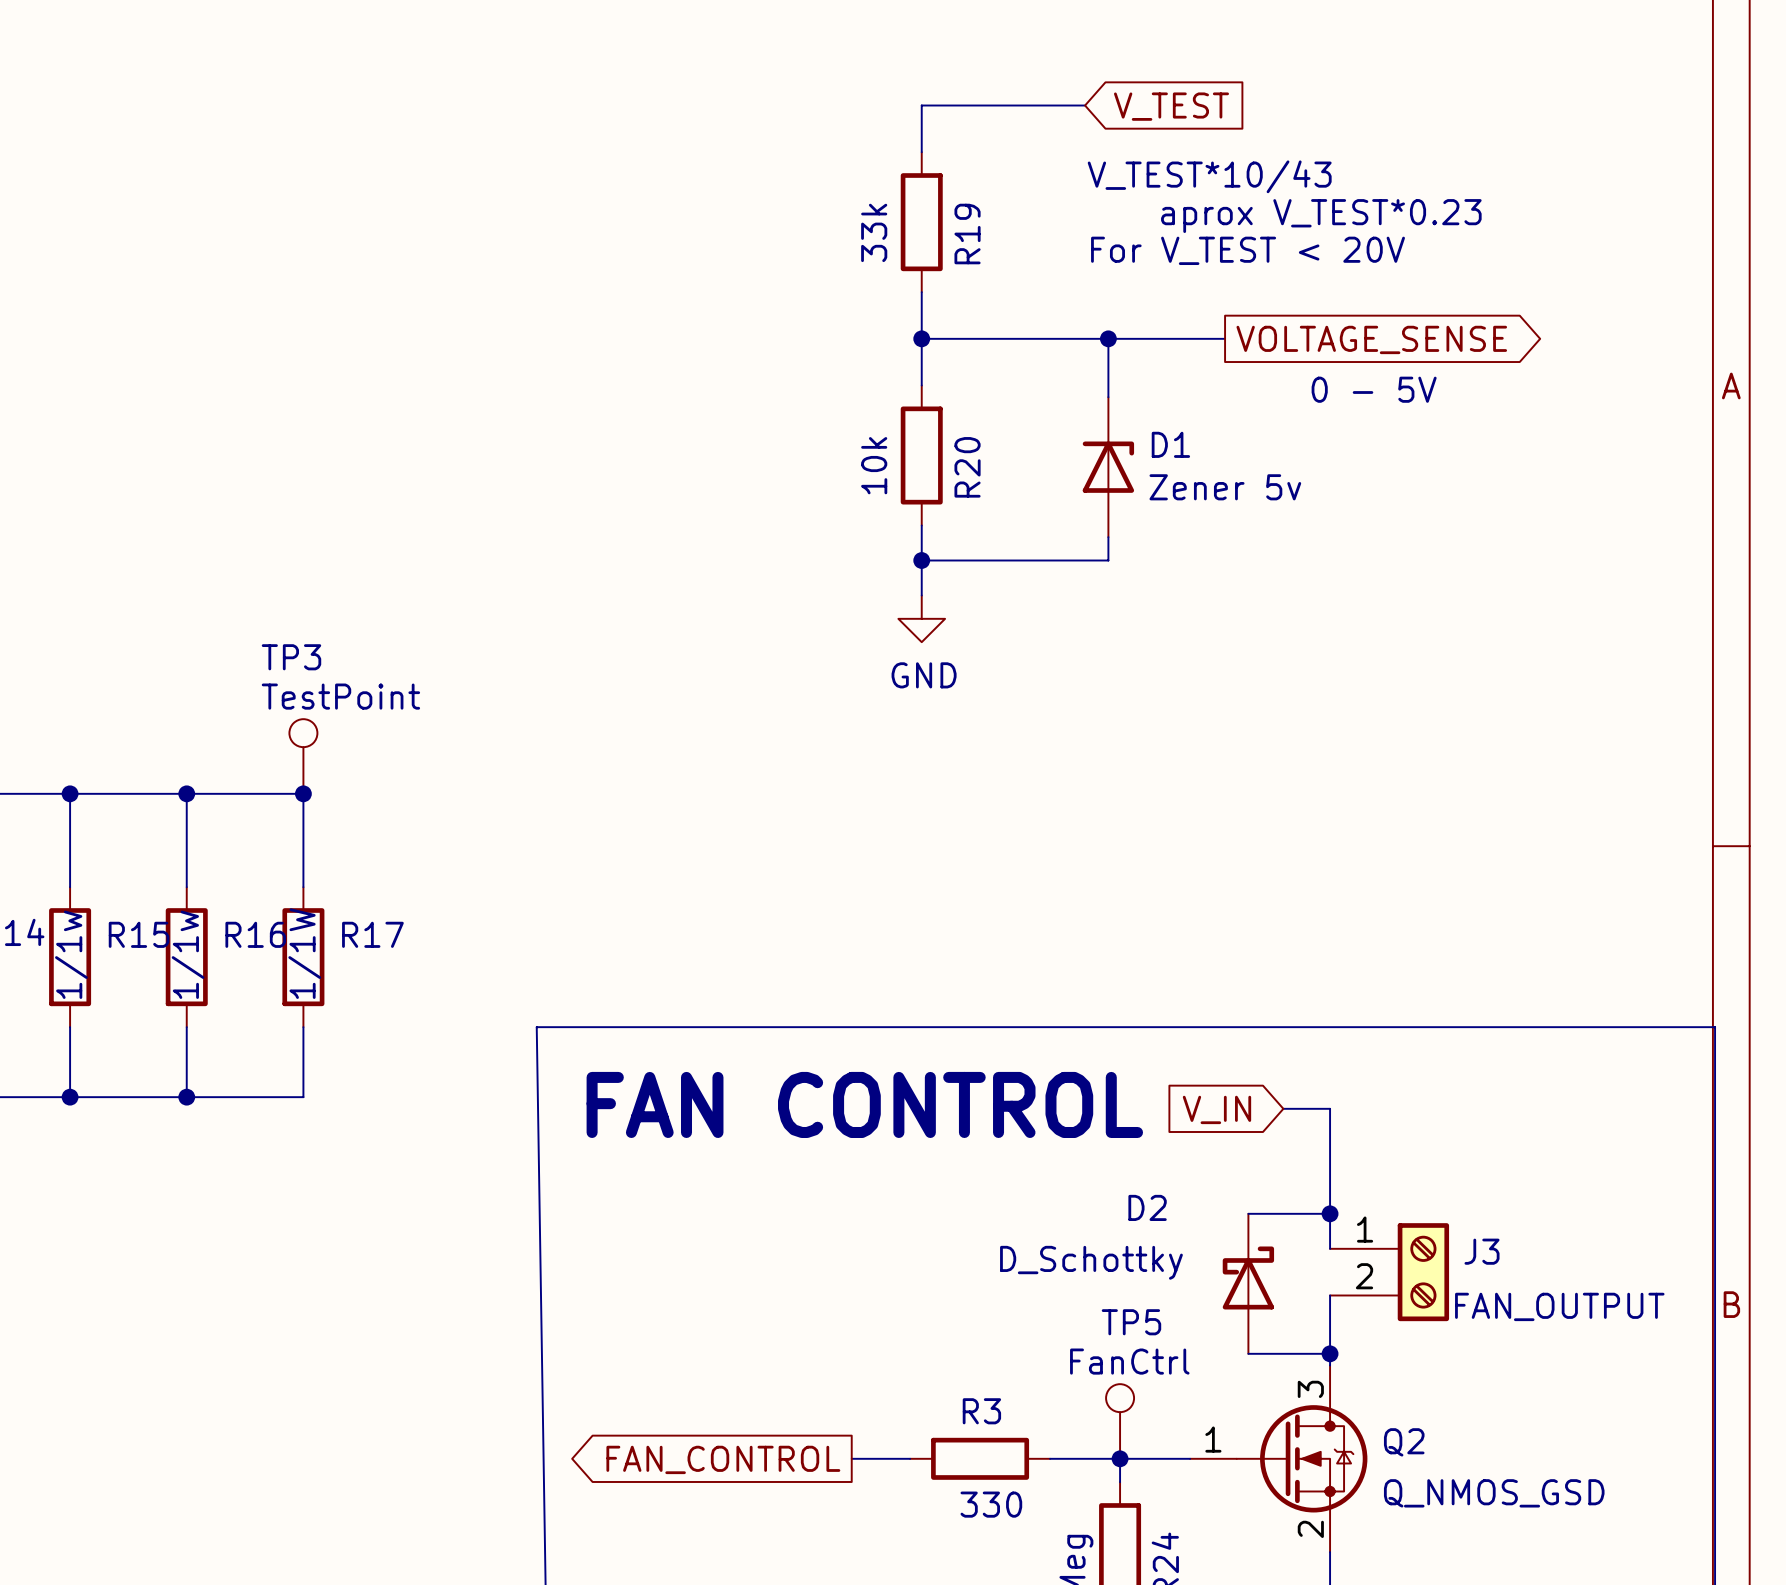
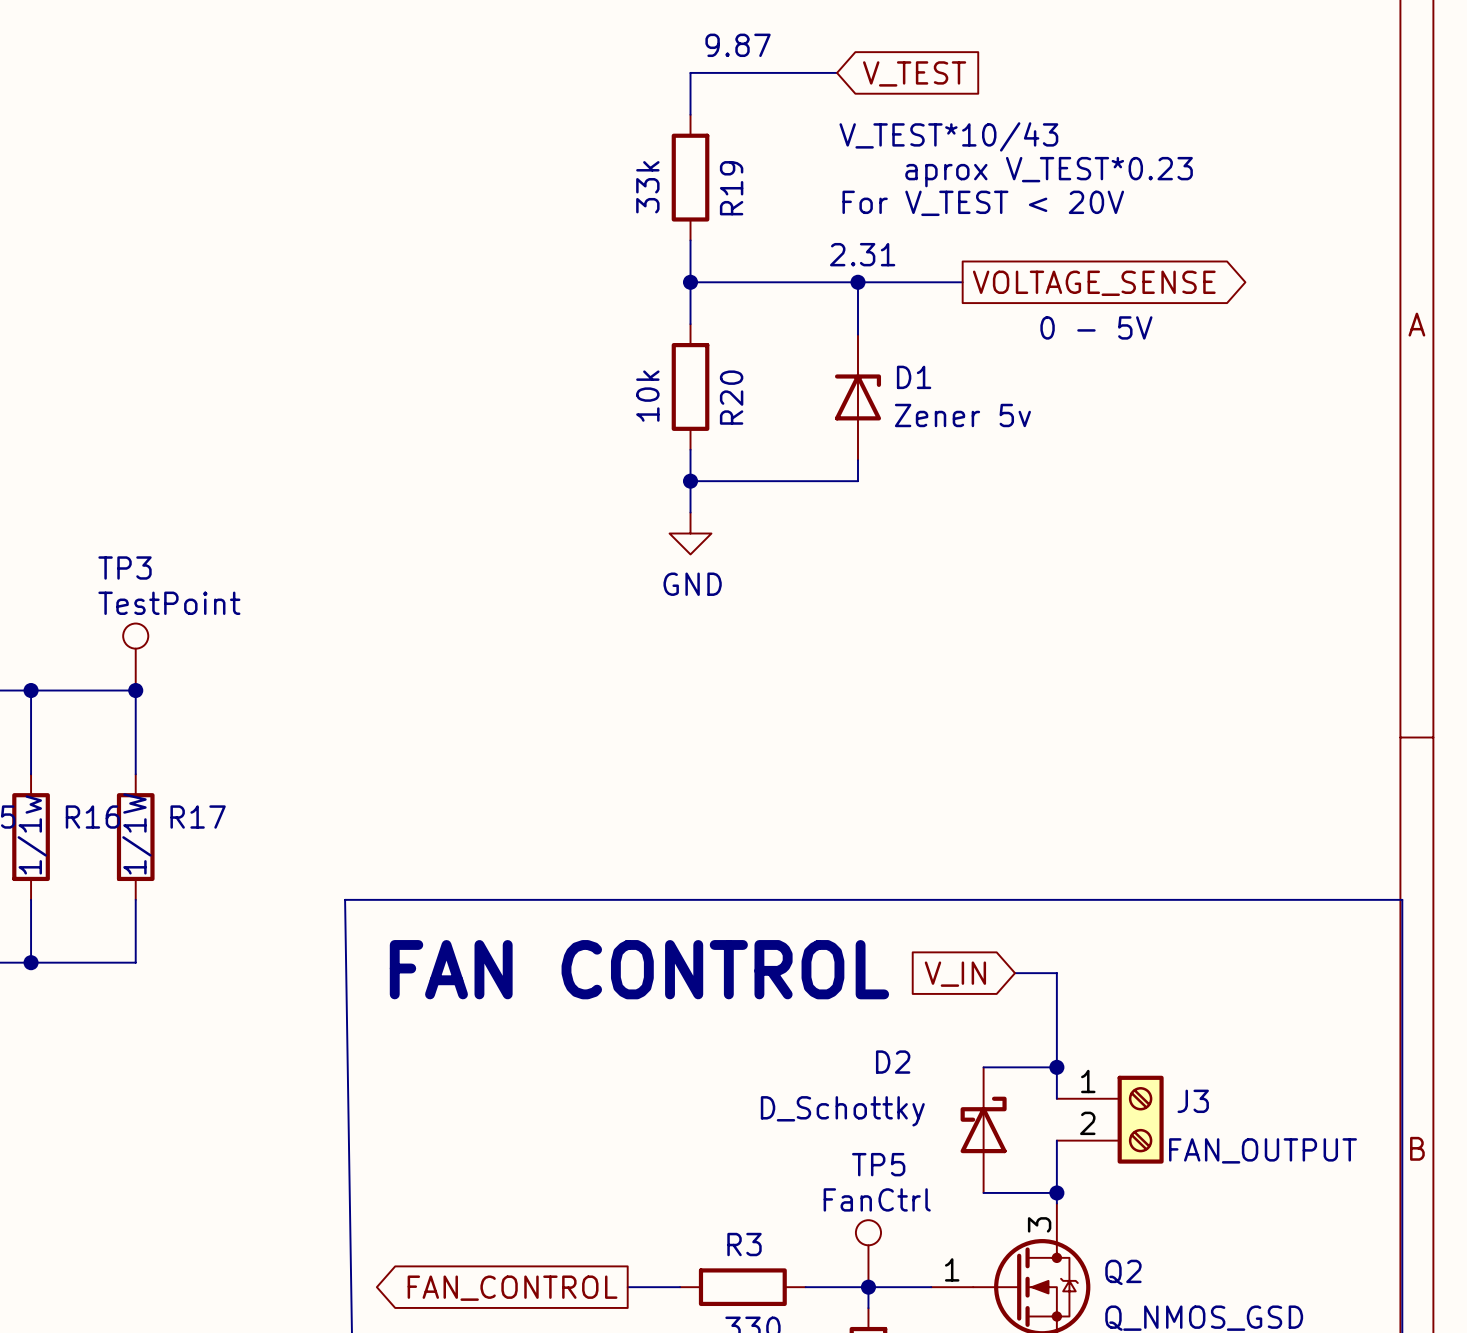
text: none -> 9.87 (738, 45)
text: none -> 2.31 (862, 254)

